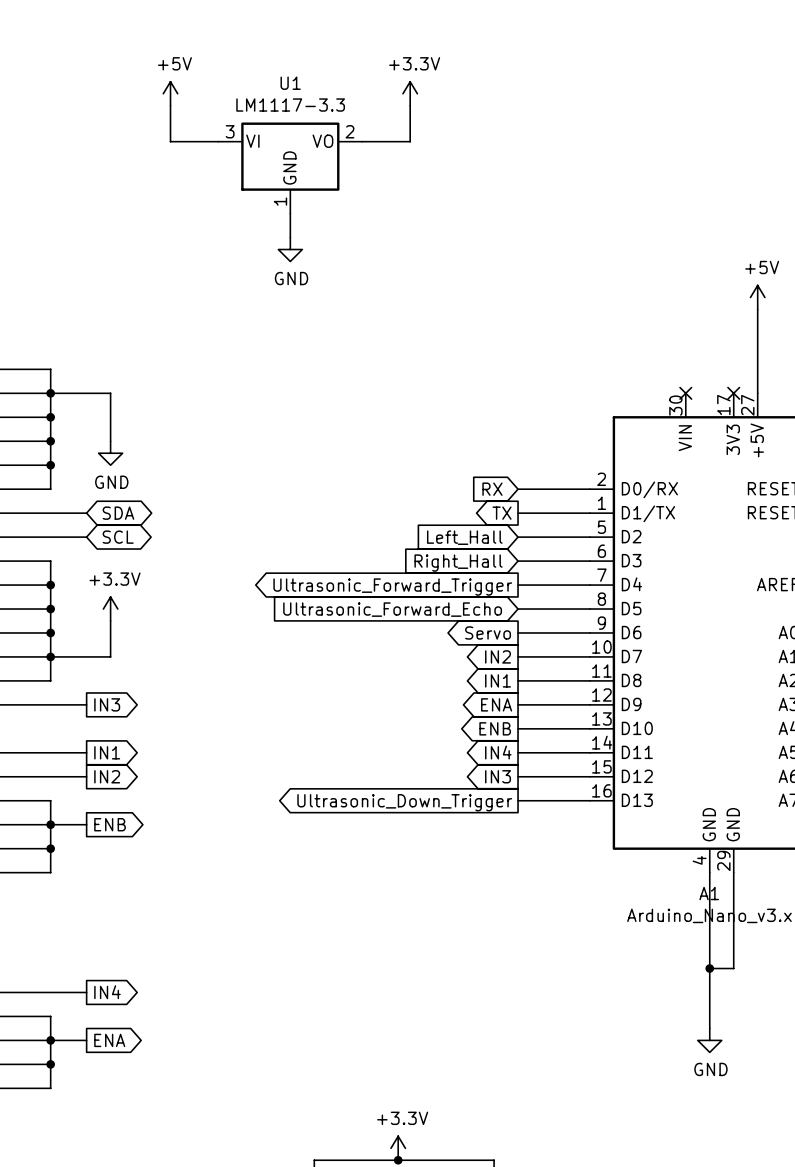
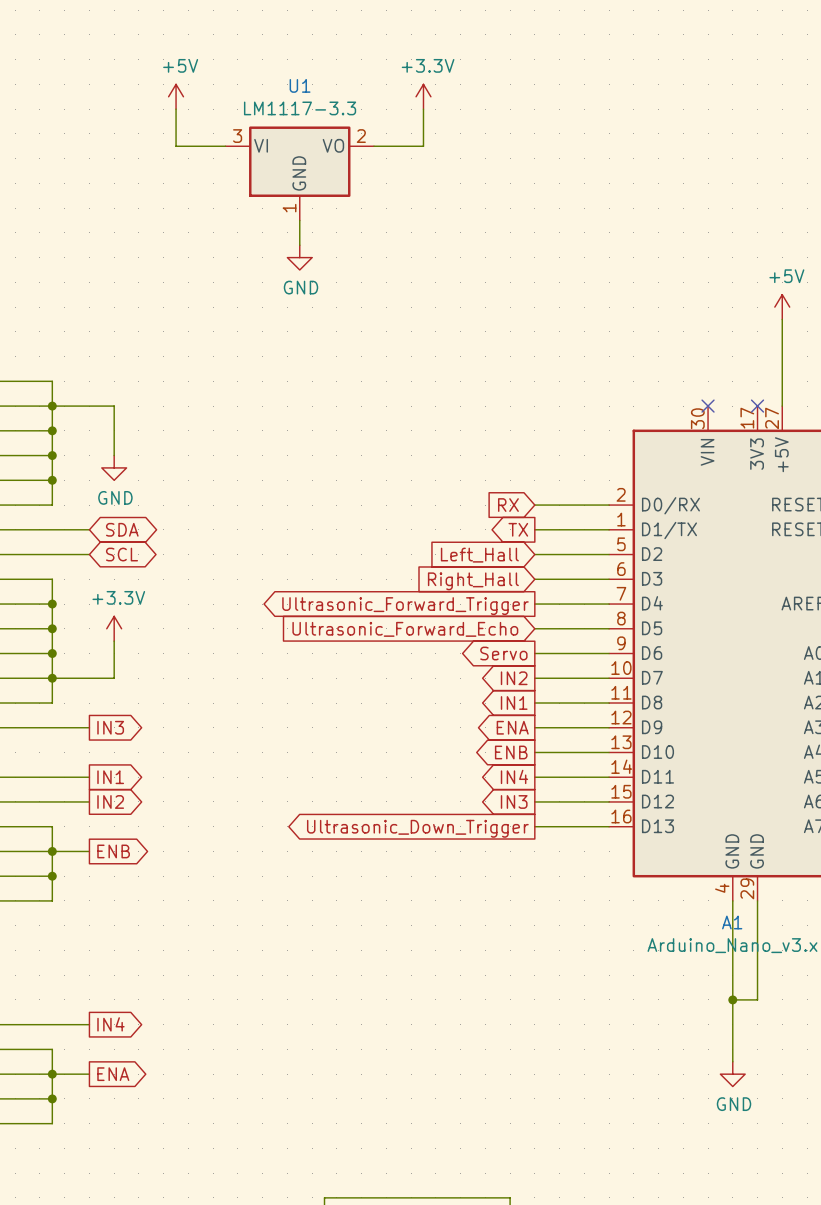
power symbol: +3.3V (398, 1148) -> none
junction: (398, 1160) -> none

